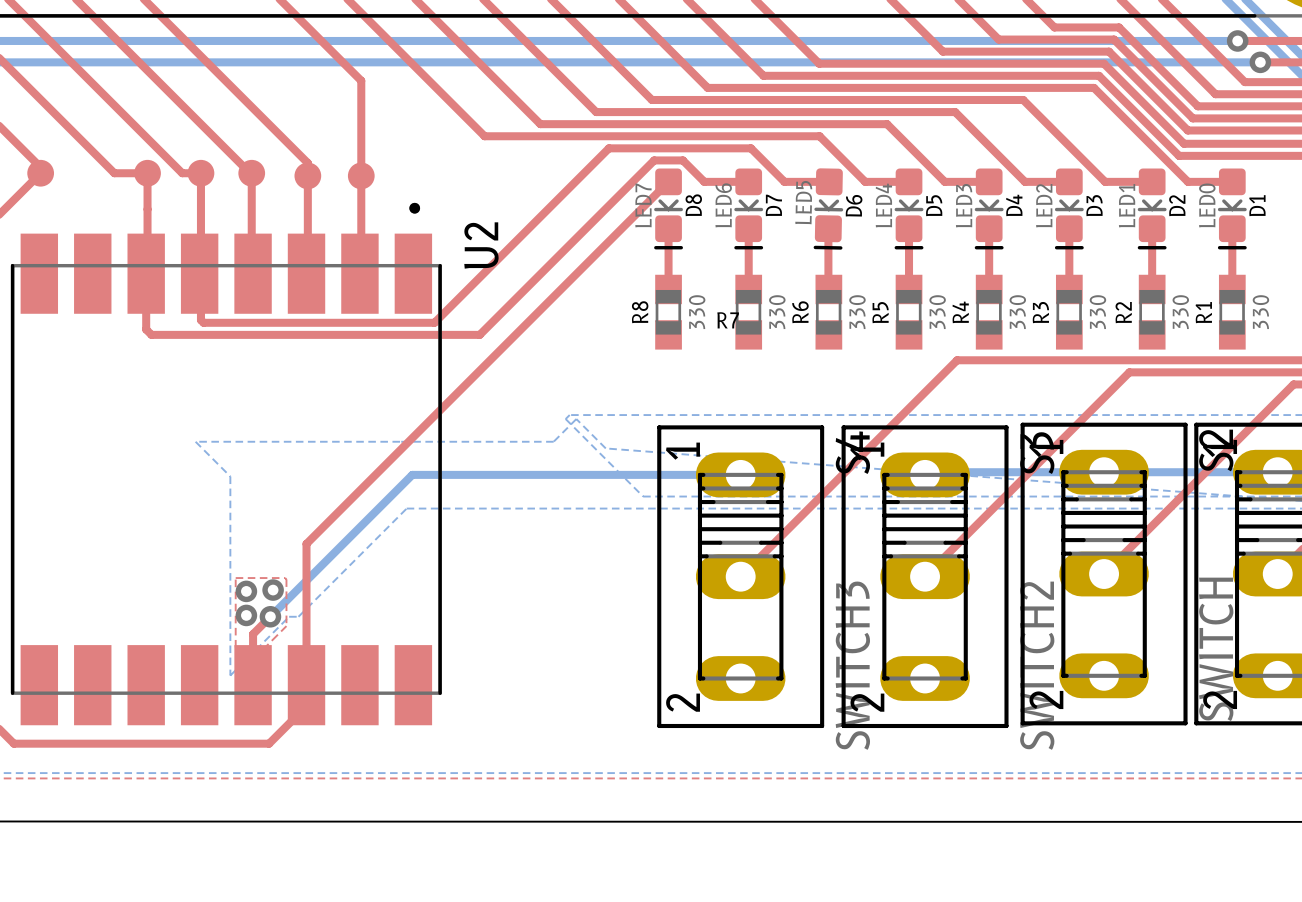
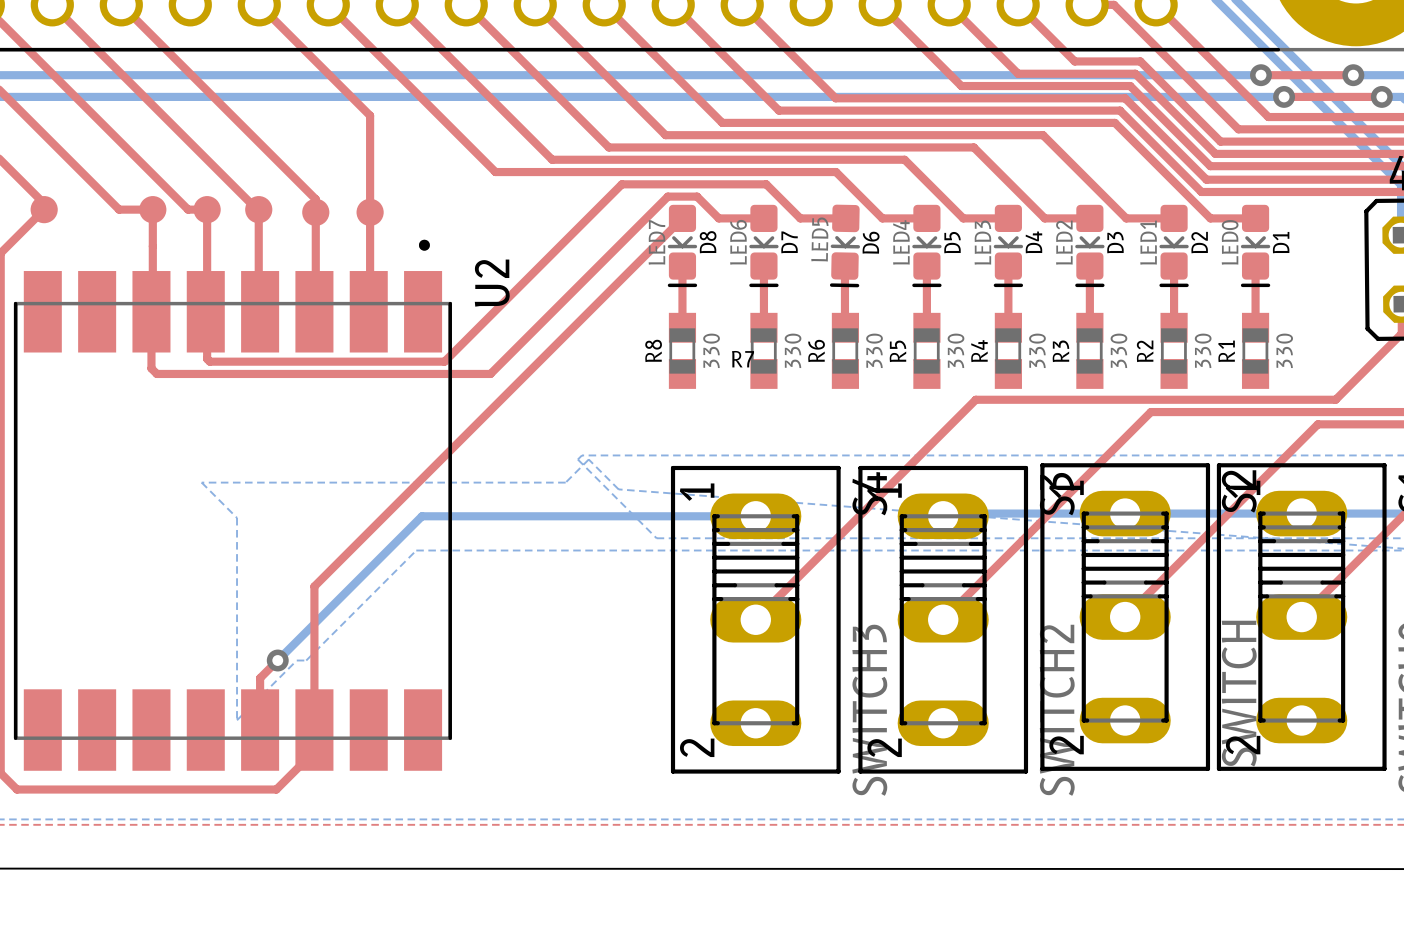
top zone outline: (235, 578) (235, 647) (258, 647) (263, 652) (263, 648) (286, 626) (286, 579) (235, 578) -> none
via: (273, 590) -> none
via: (246, 591) -> none
via: (246, 615) -> none

